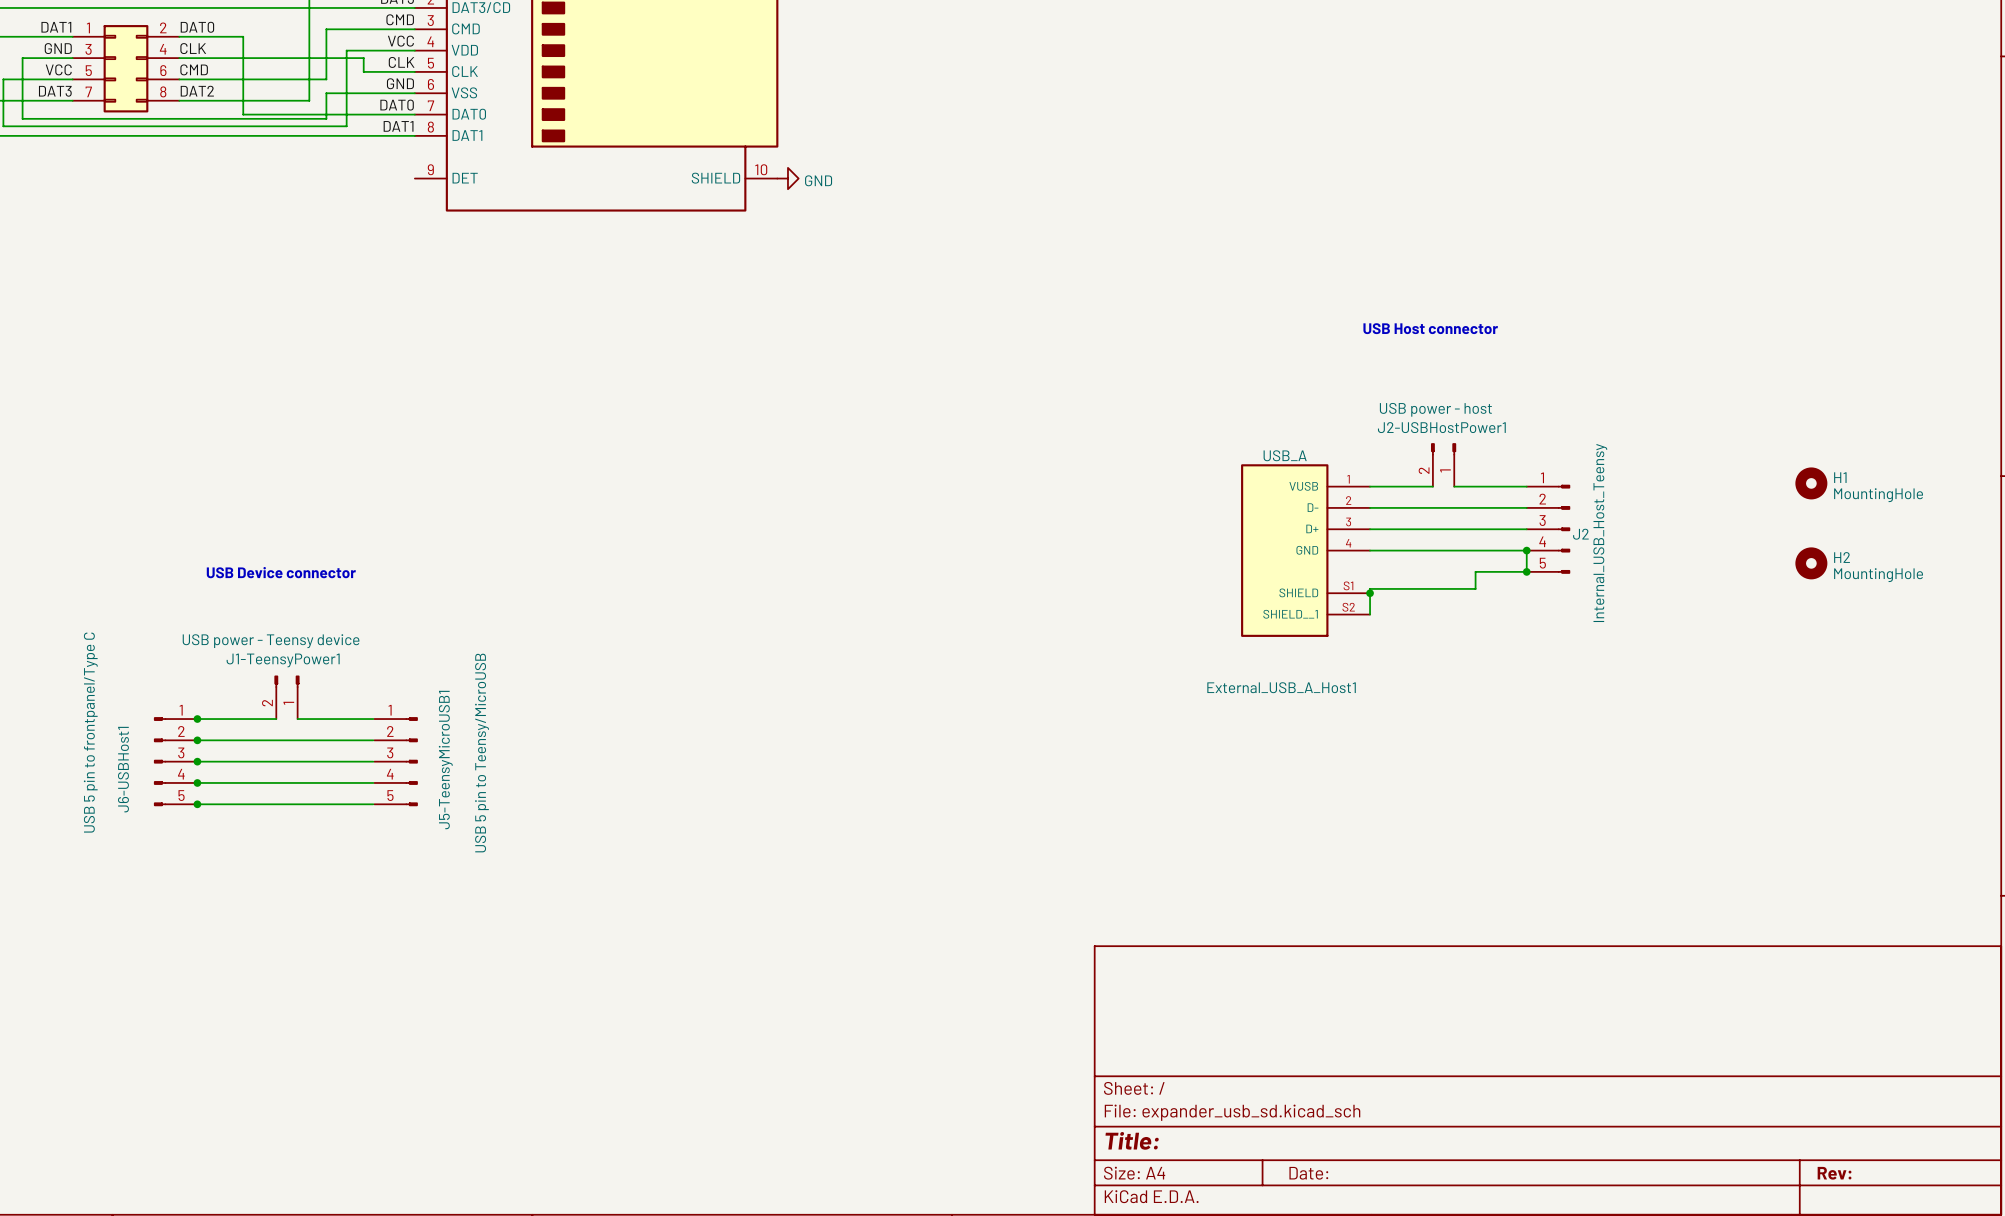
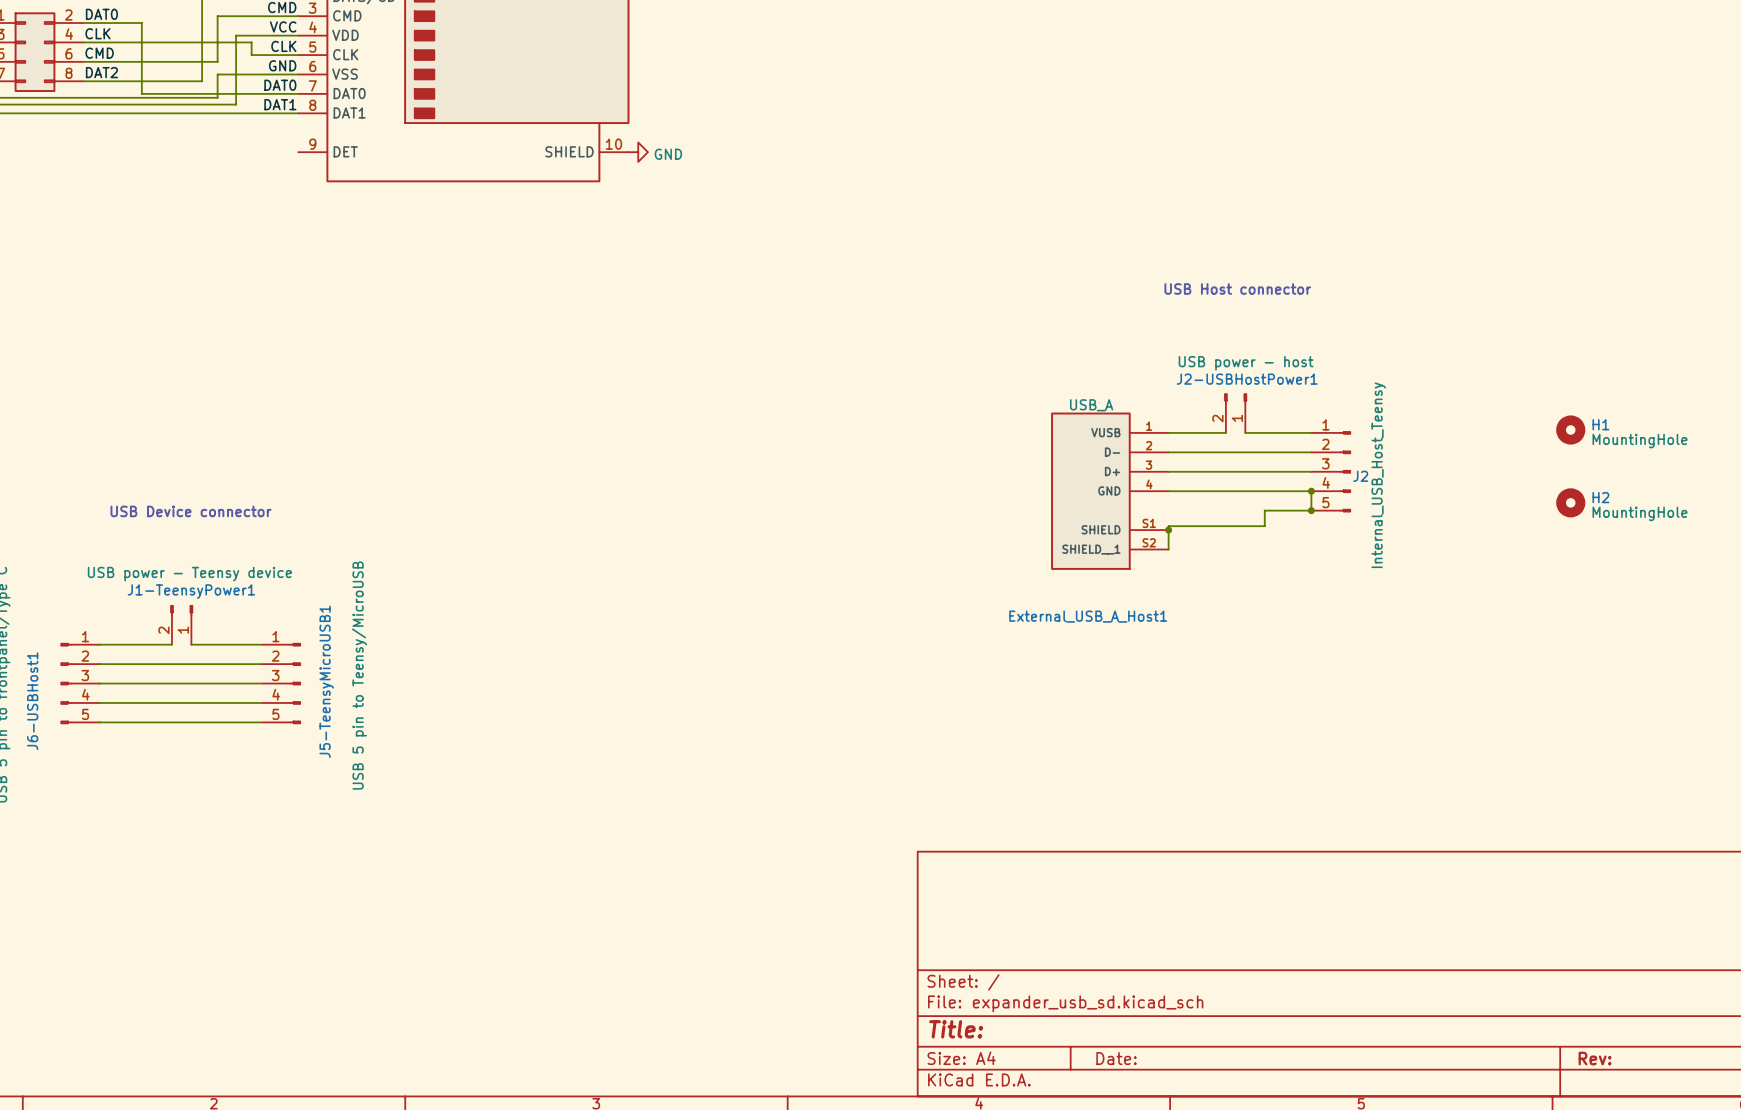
junction: (197, 719) -> none
junction: (197, 740) -> none
junction: (197, 761) -> none
junction: (197, 782) -> none
junction: (197, 804) -> none

